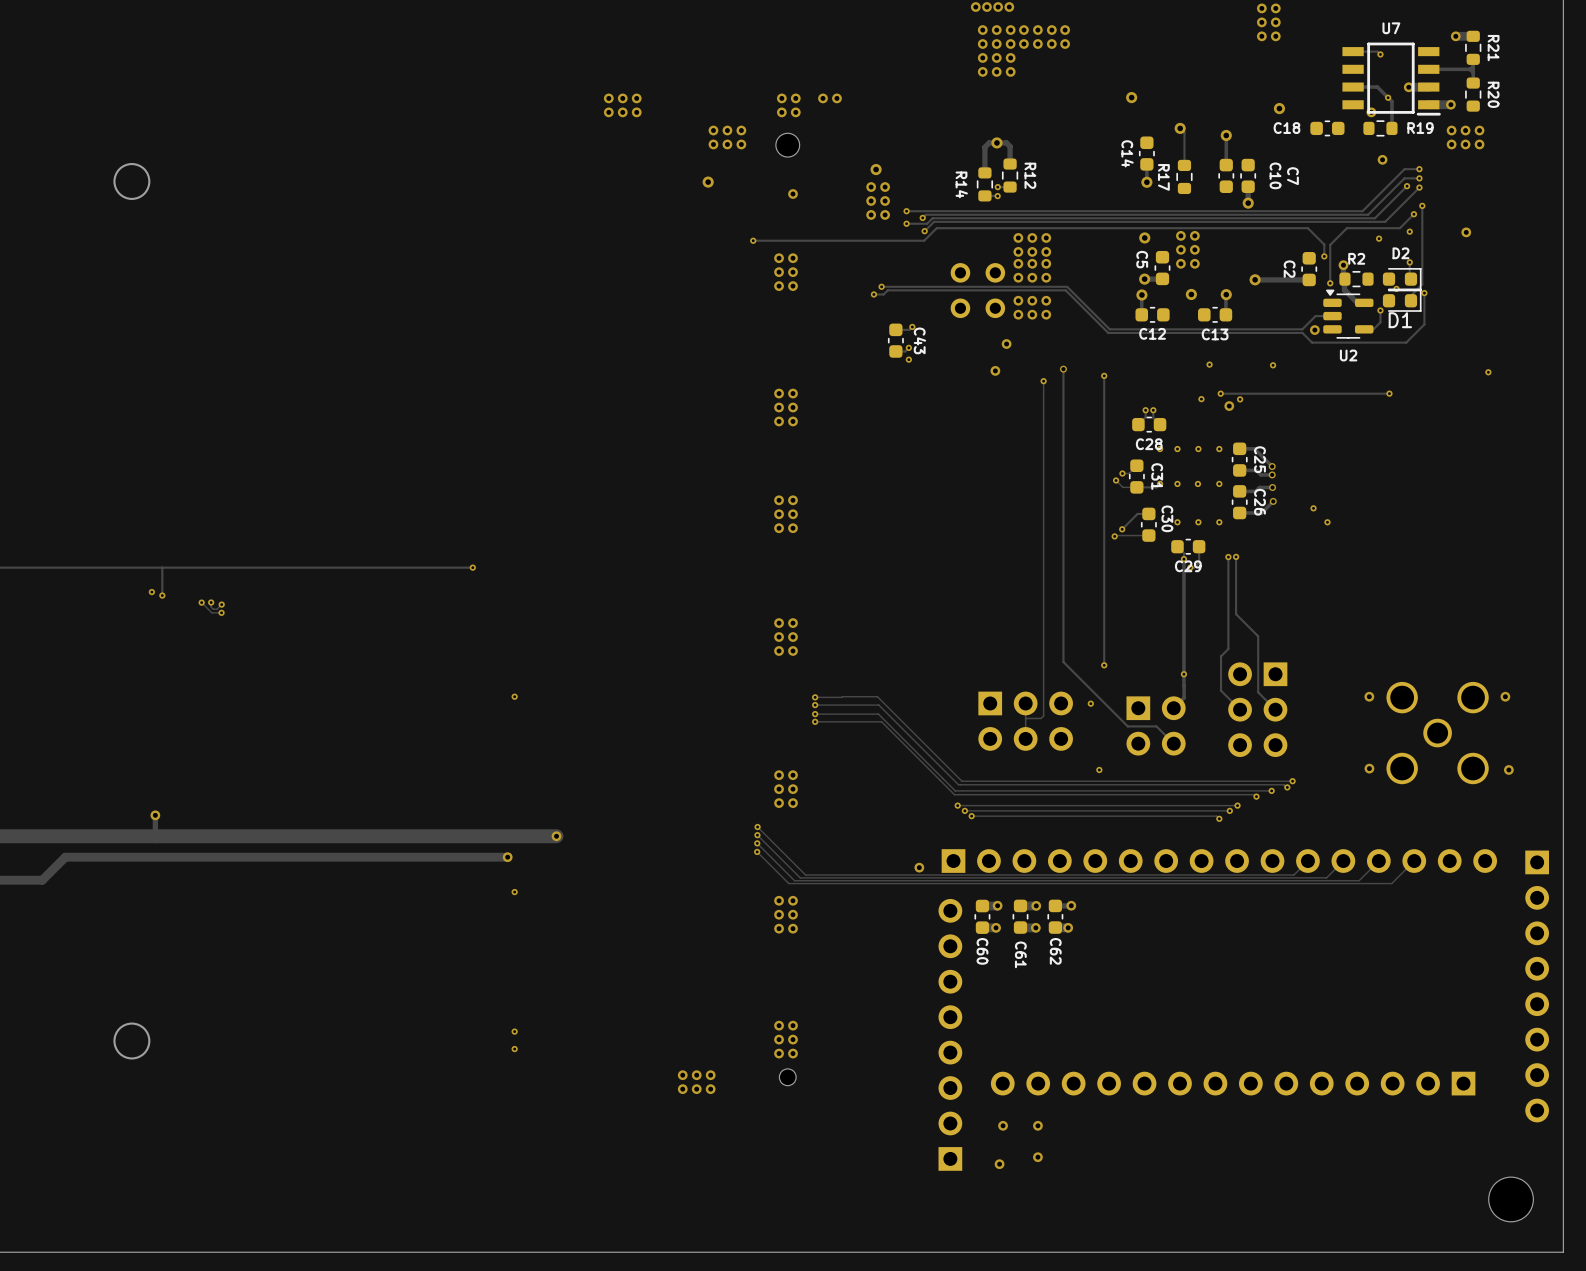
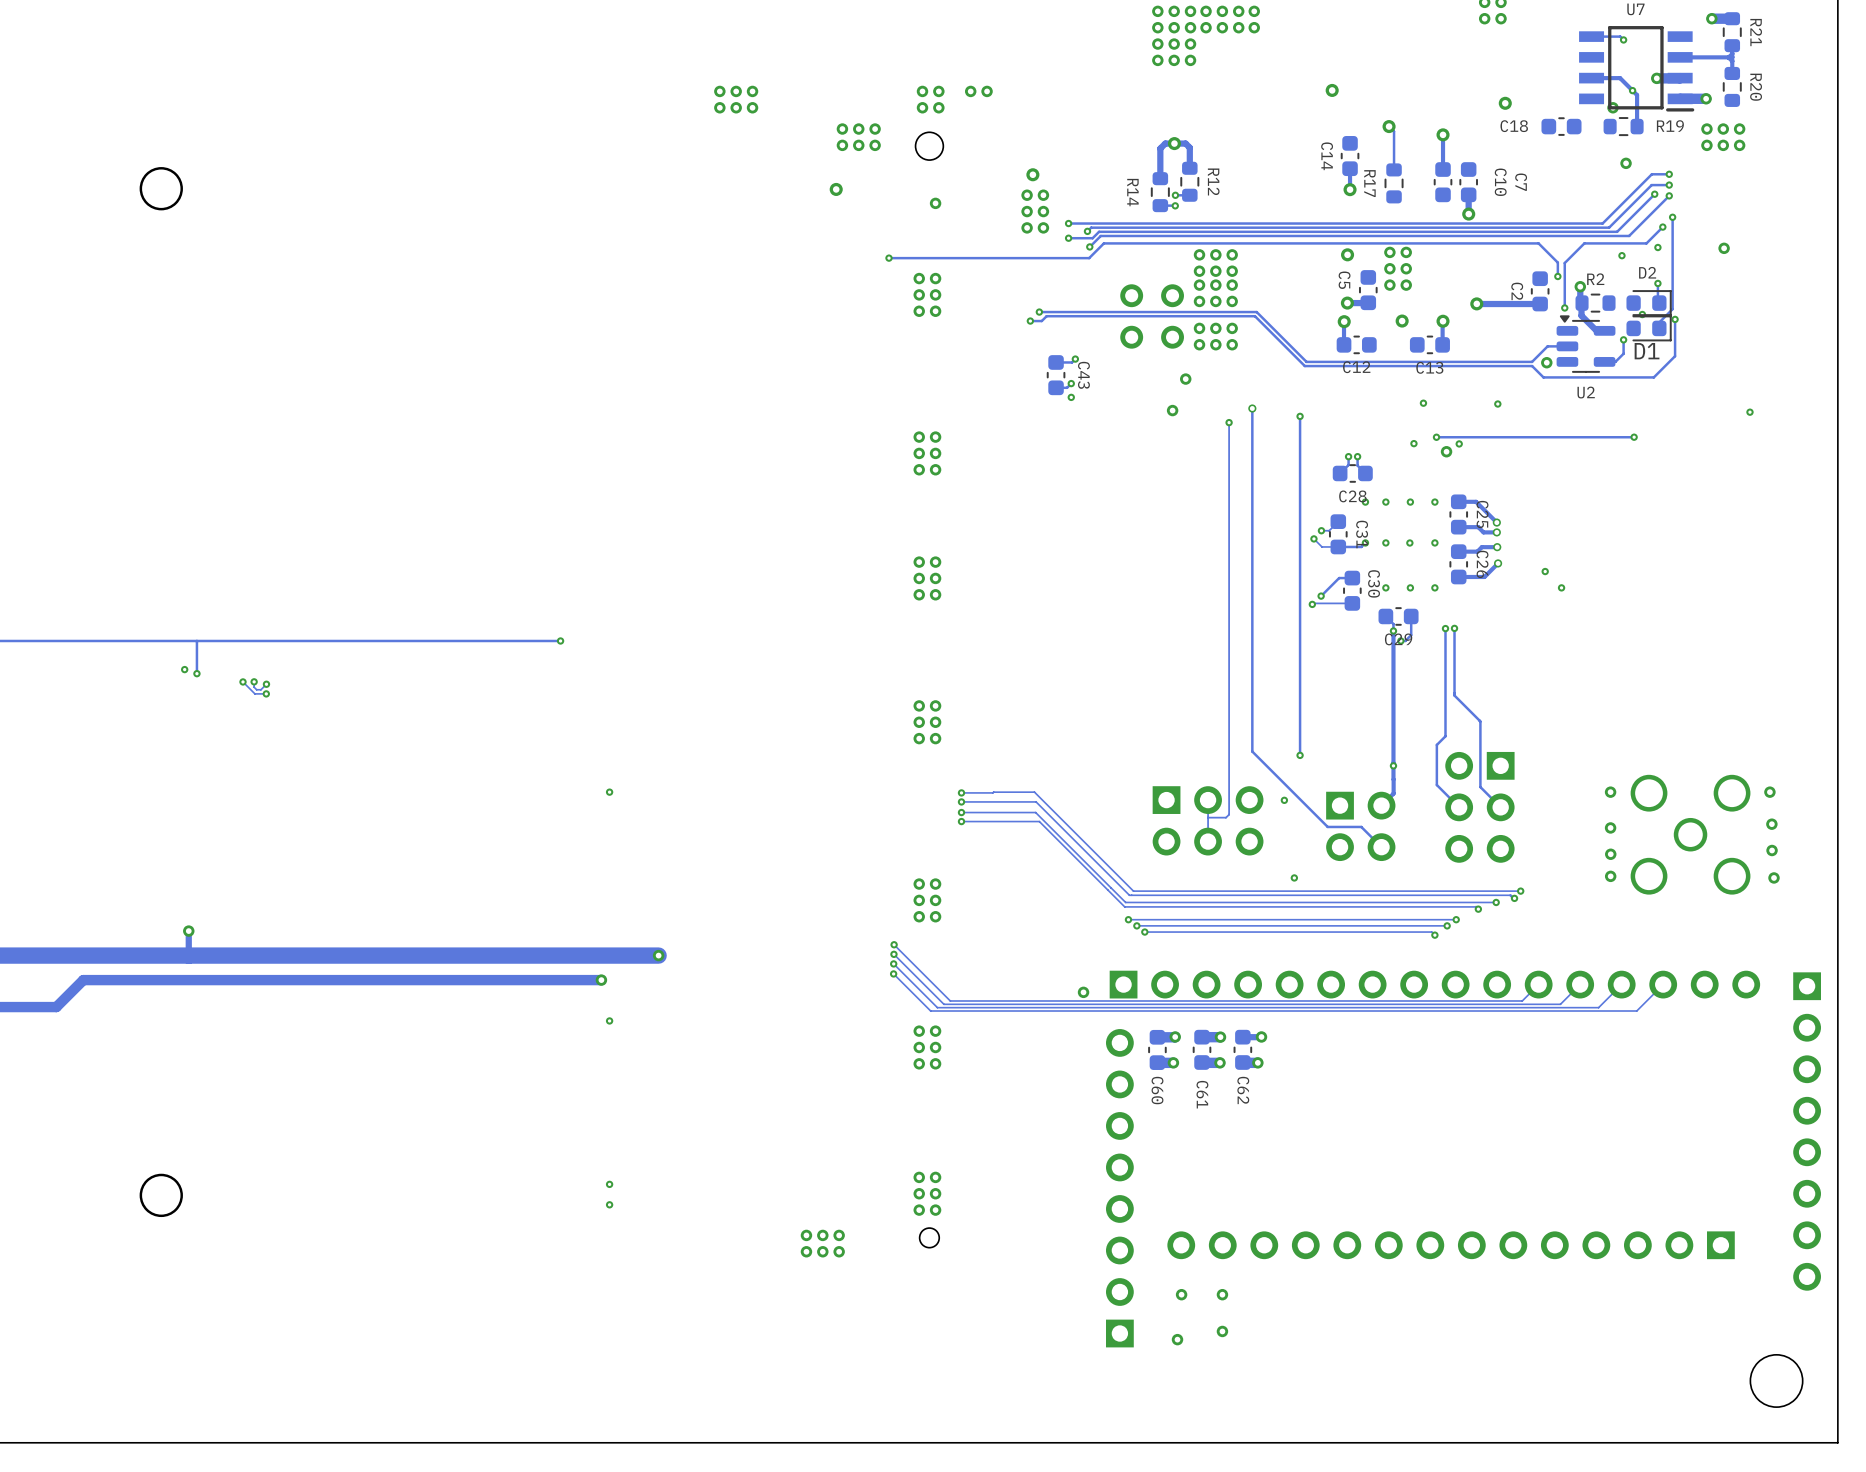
via: none -> (1771, 824)
via: none -> (1610, 827)
via: none -> (1772, 850)
via: none -> (1610, 854)

